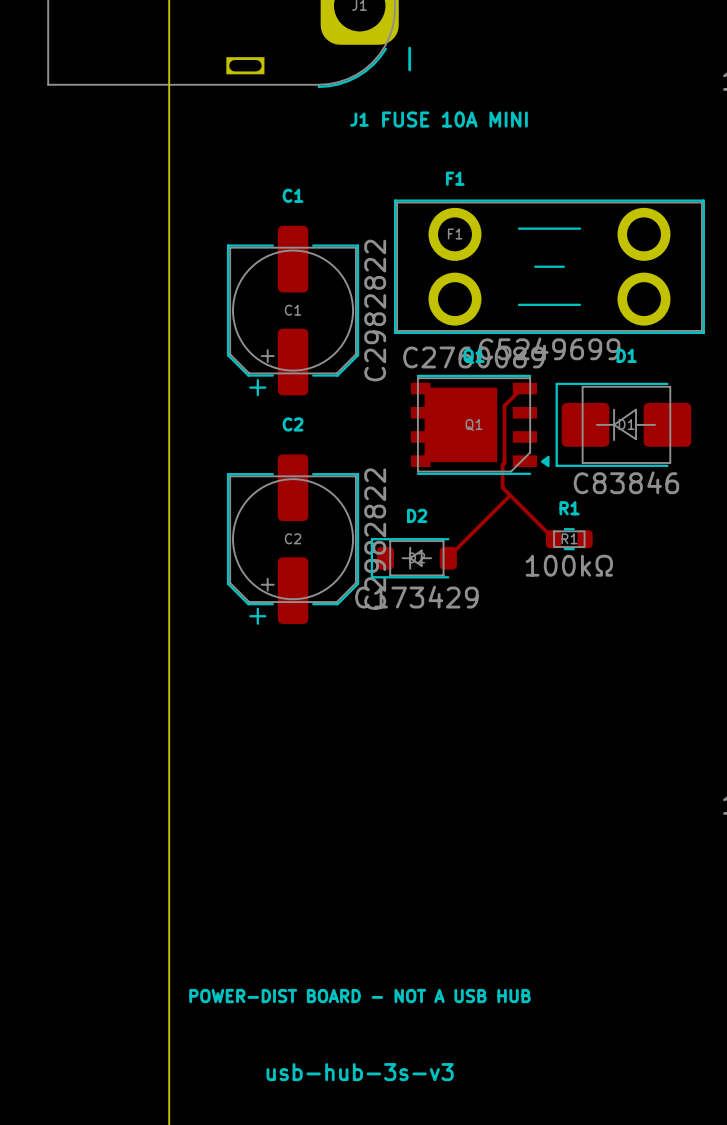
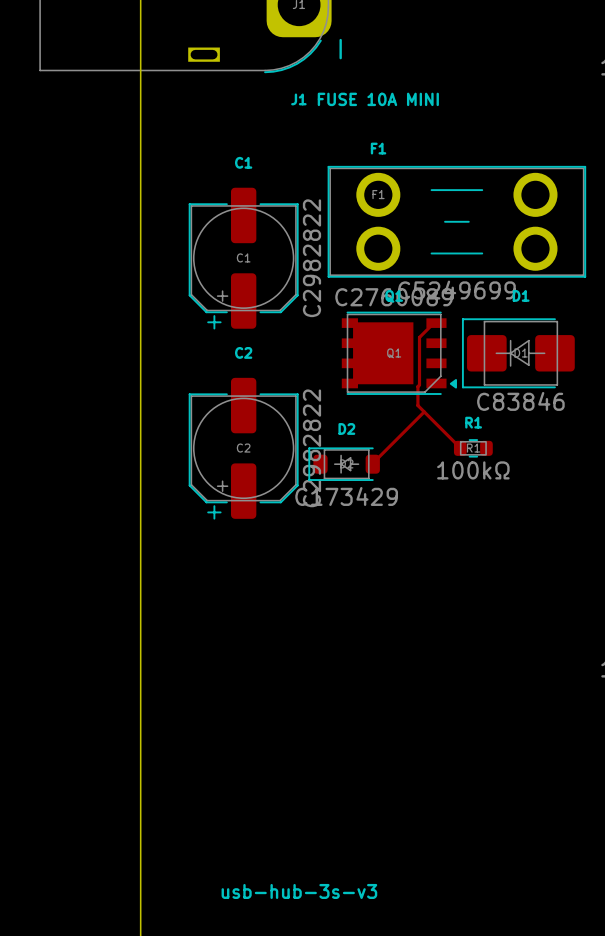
text: POWER-DIST BOARD - NOT A USB HUB (359, 996) -> none

